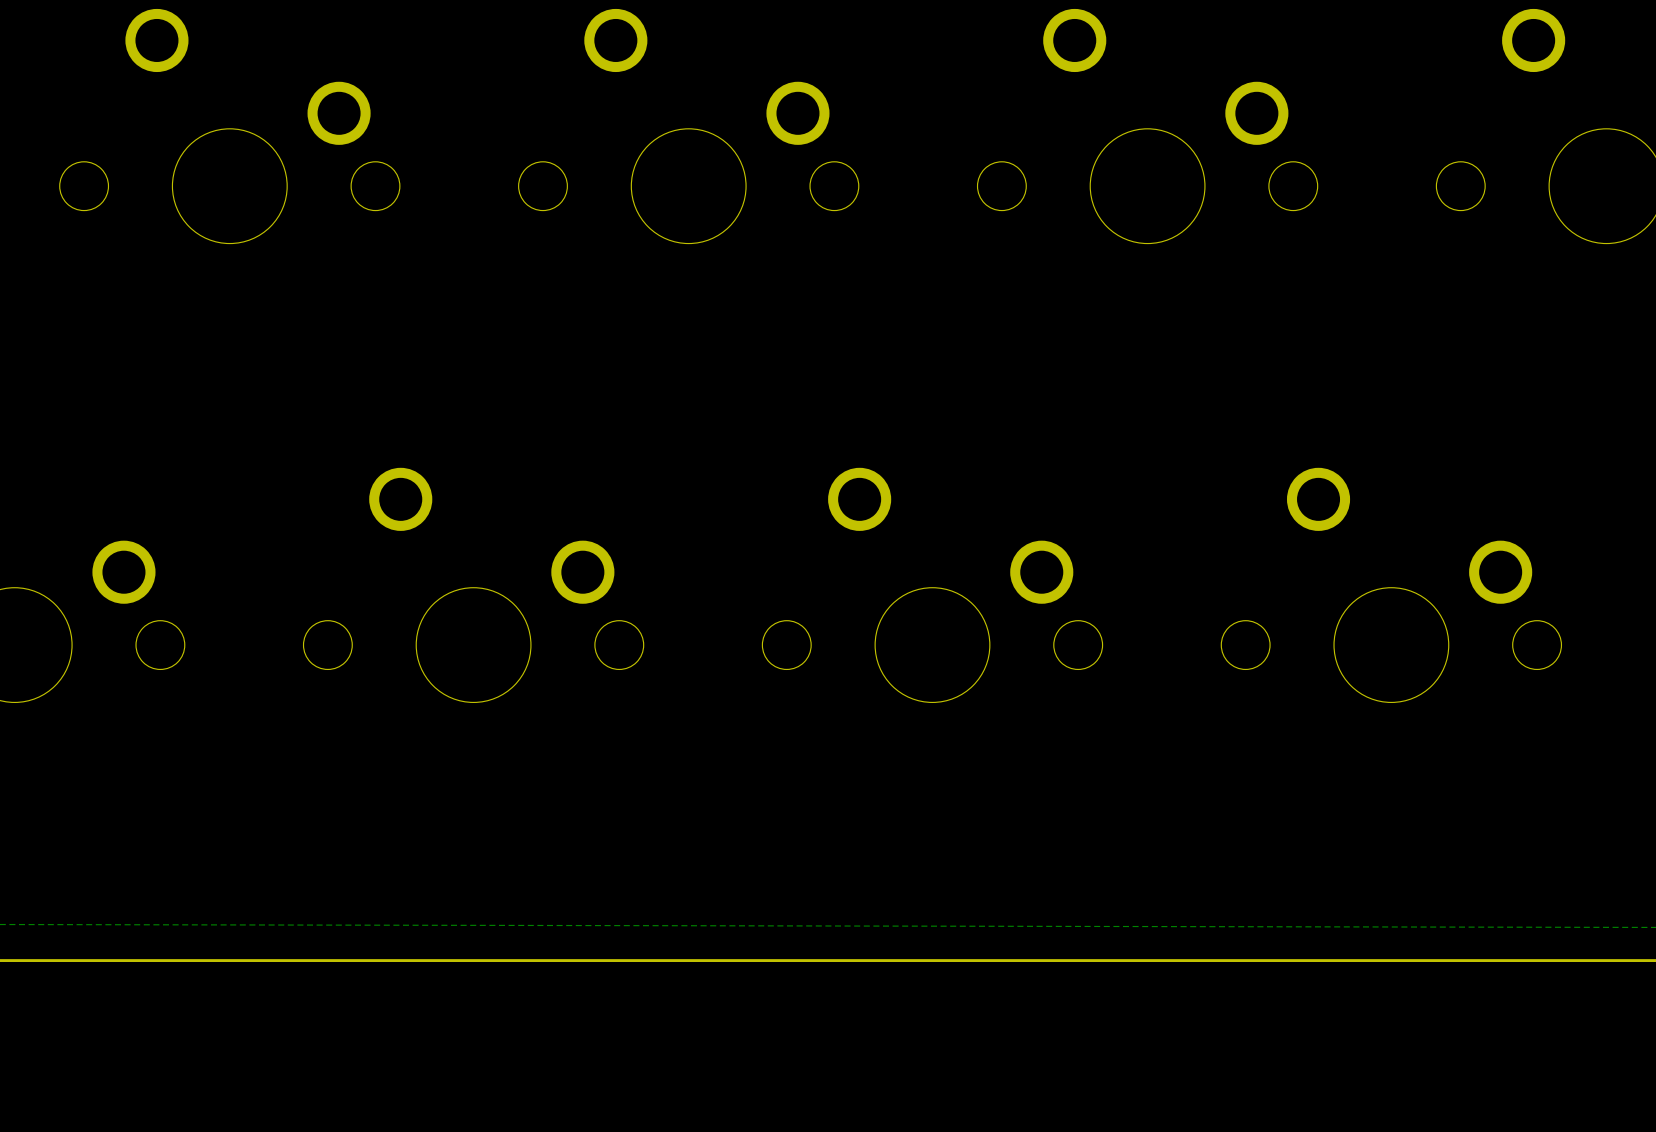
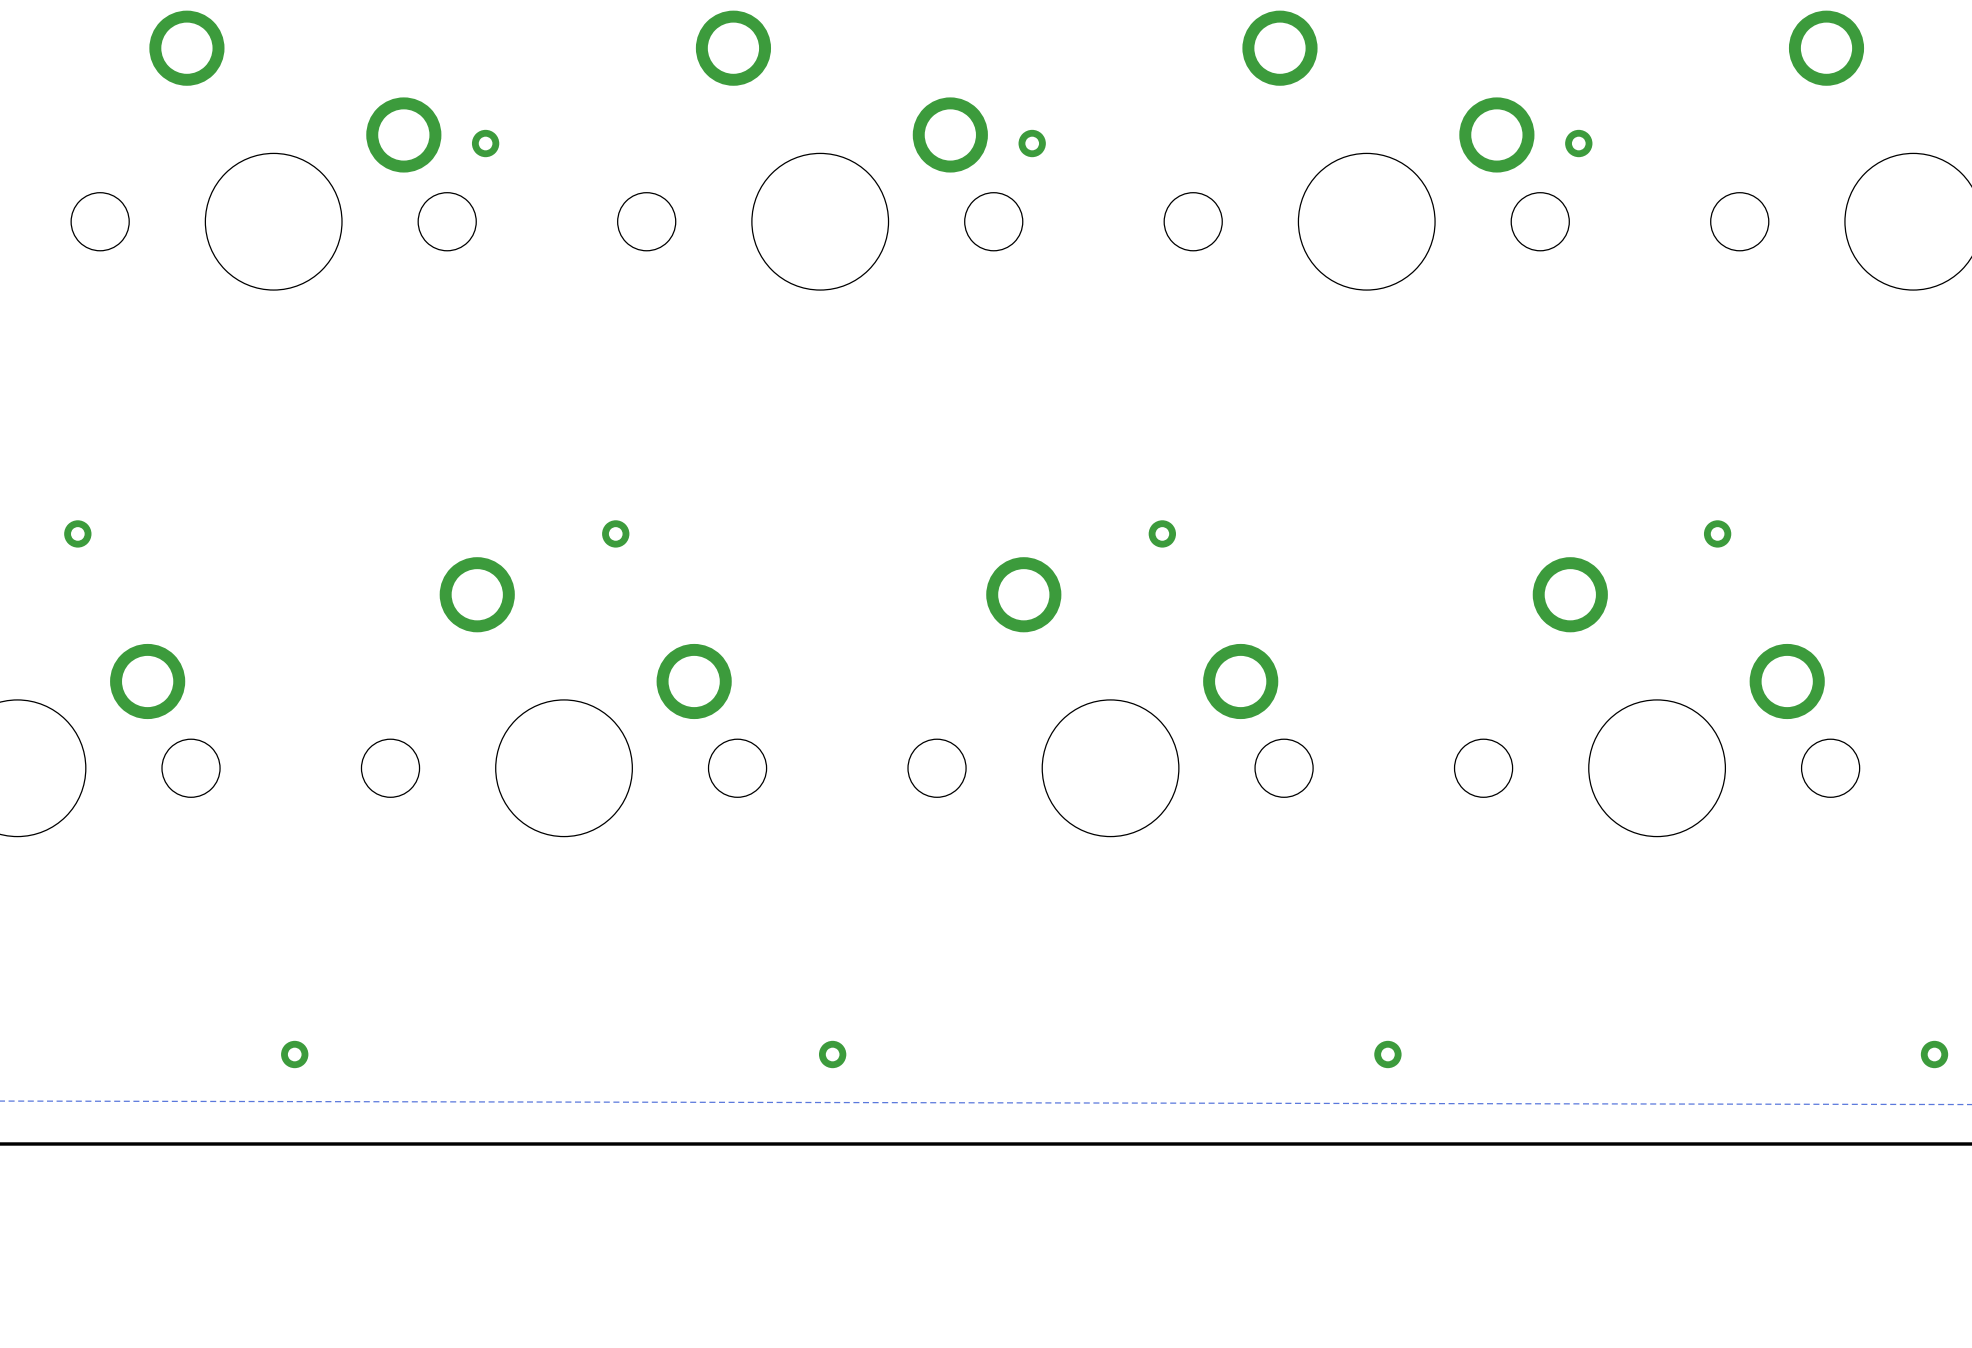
via: none -> (485, 143)
via: none -> (1032, 143)
via: none -> (1578, 143)
via: none -> (77, 533)
via: none -> (615, 533)
via: none -> (1162, 533)
via: none -> (1717, 533)
via: none -> (294, 1054)
via: none -> (832, 1054)
via: none -> (1387, 1054)
via: none -> (1934, 1054)

